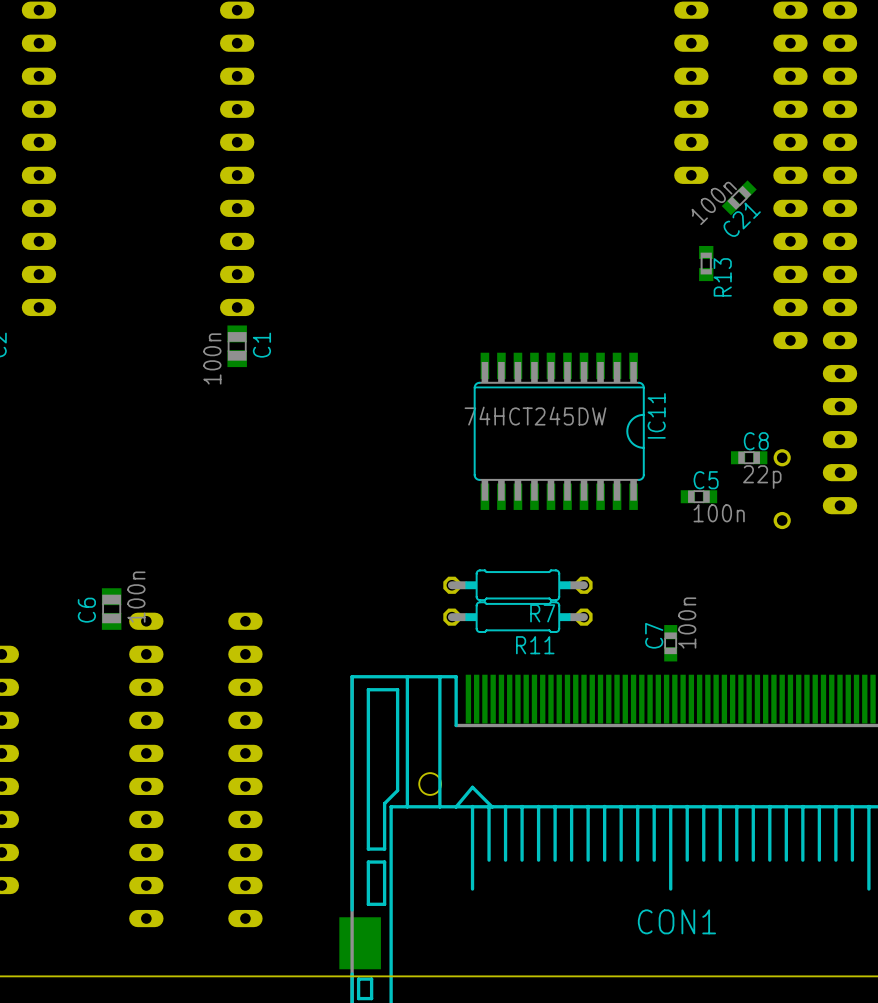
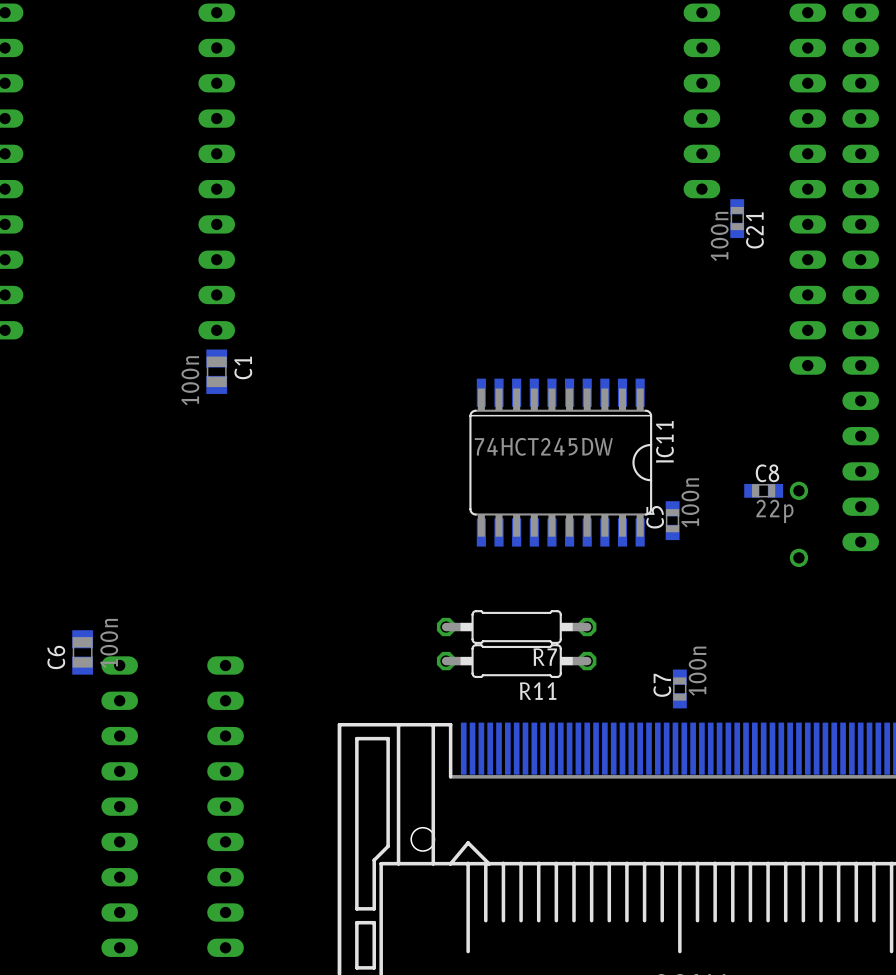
C21 rotation: 0° (739, 197) -> 45° counterclockwise (737, 218)
R13: (706, 263) -> none
C5 name position: C5 (706, 480) -> C5 (655, 517)
C5 rotation: 0° (698, 496) -> 90° clockwise (672, 520)
C5 position: (698, 496) -> (672, 520)
C5 value position: 100n (719, 513) -> 100n (690, 502)

